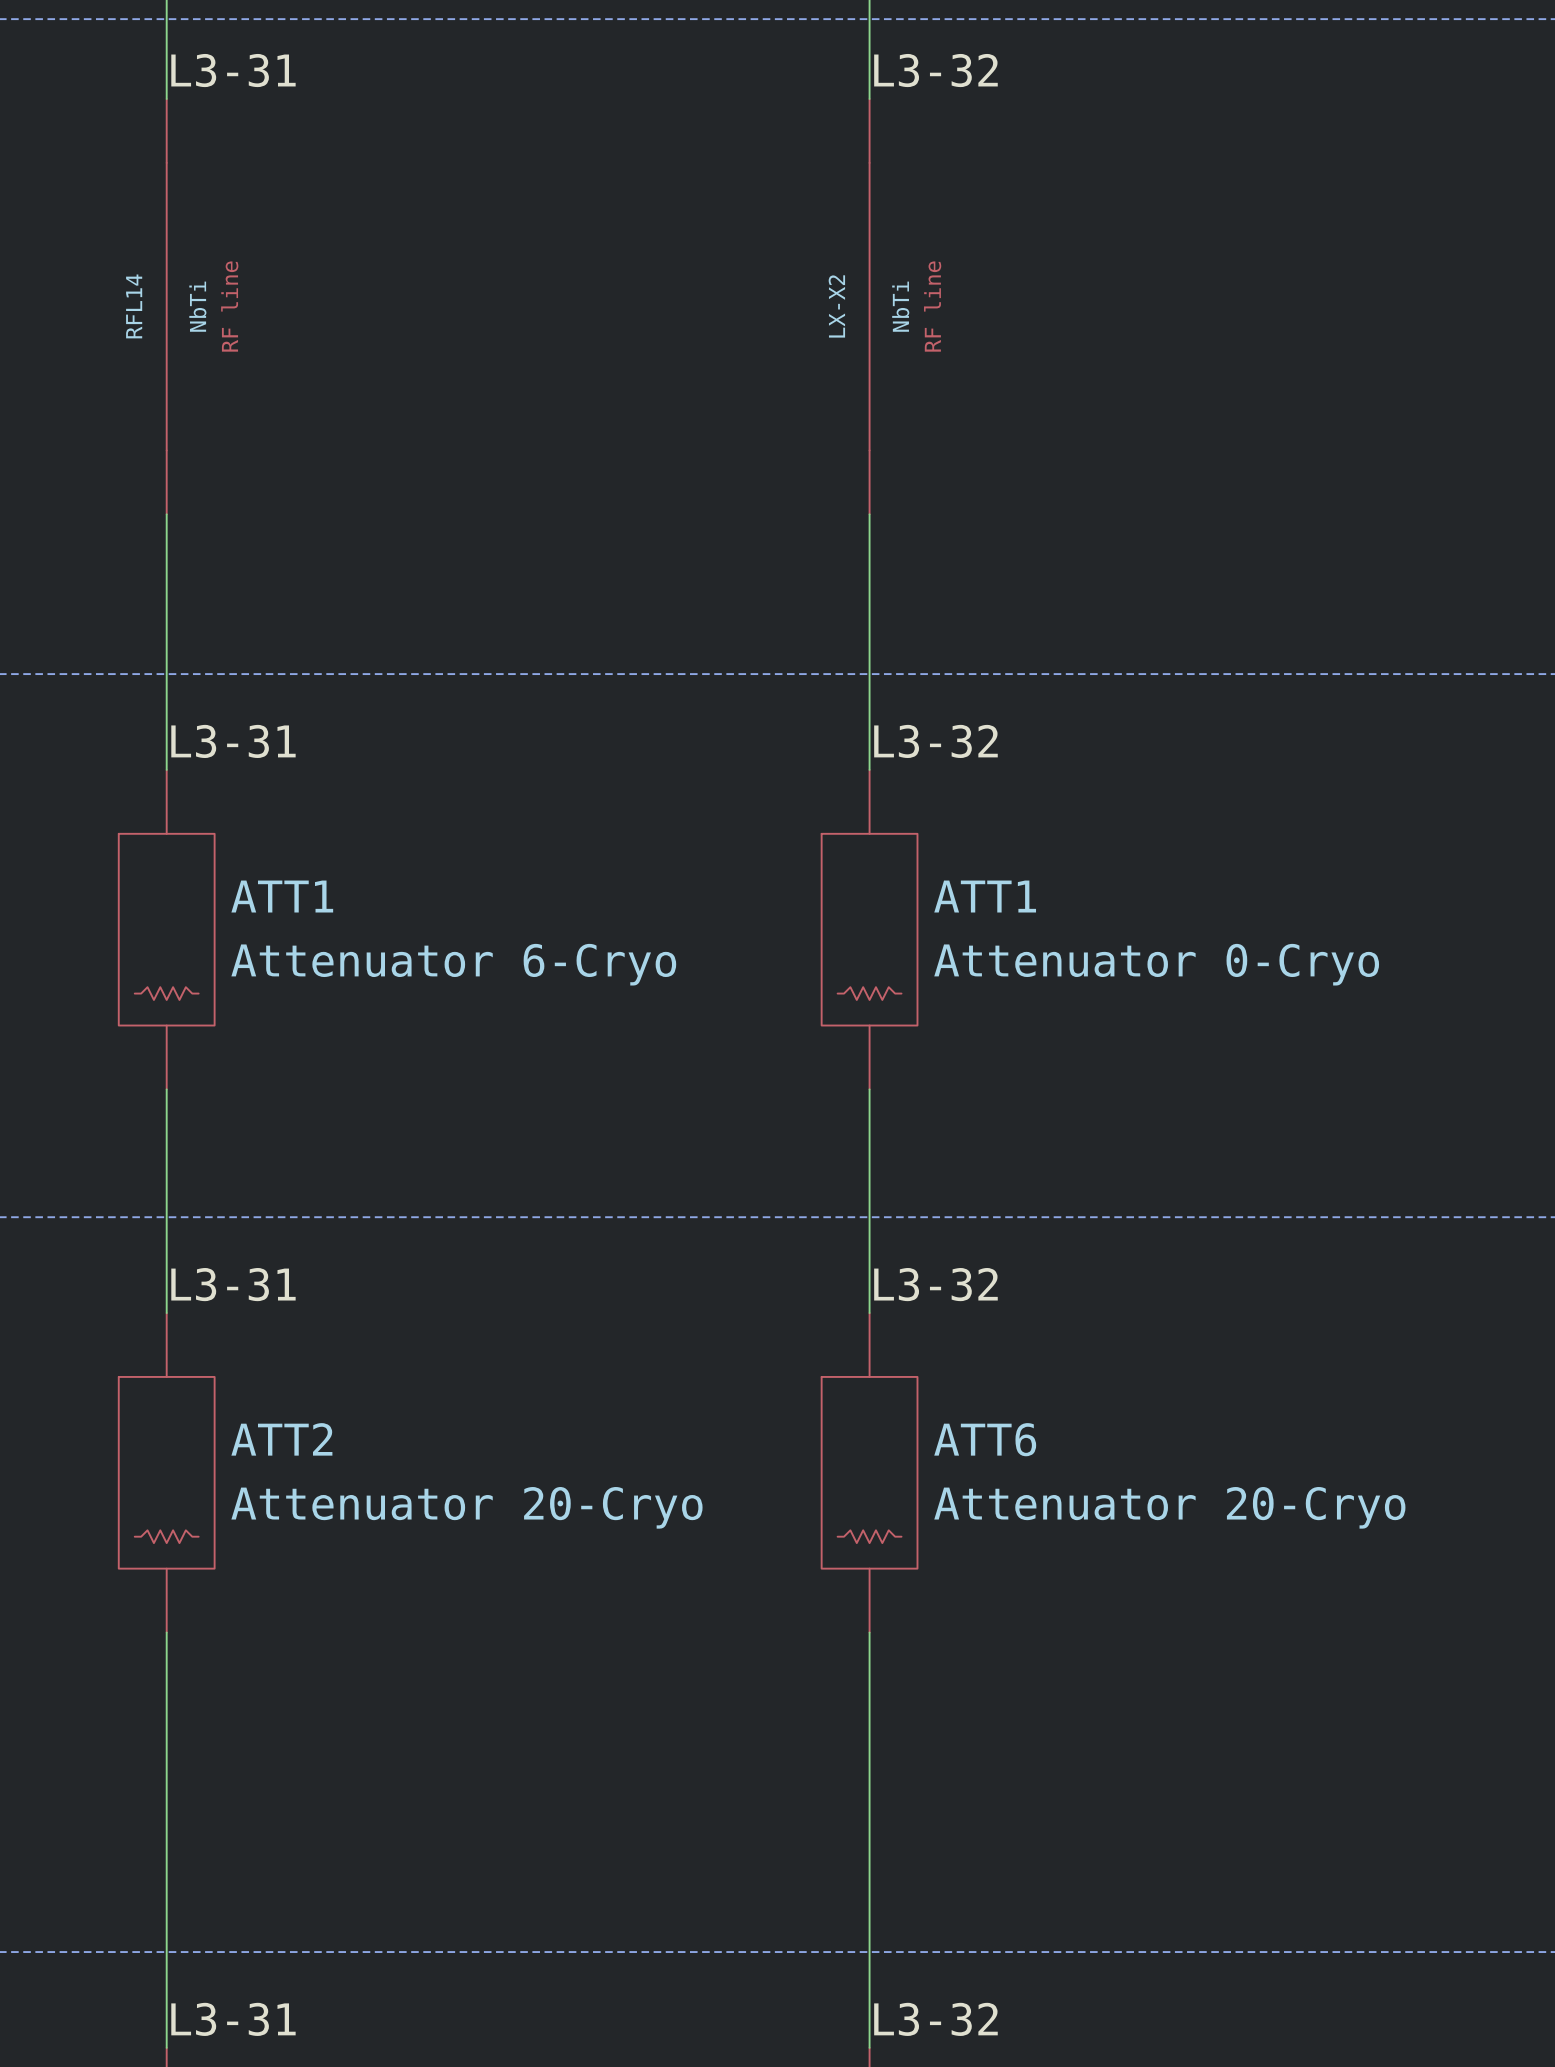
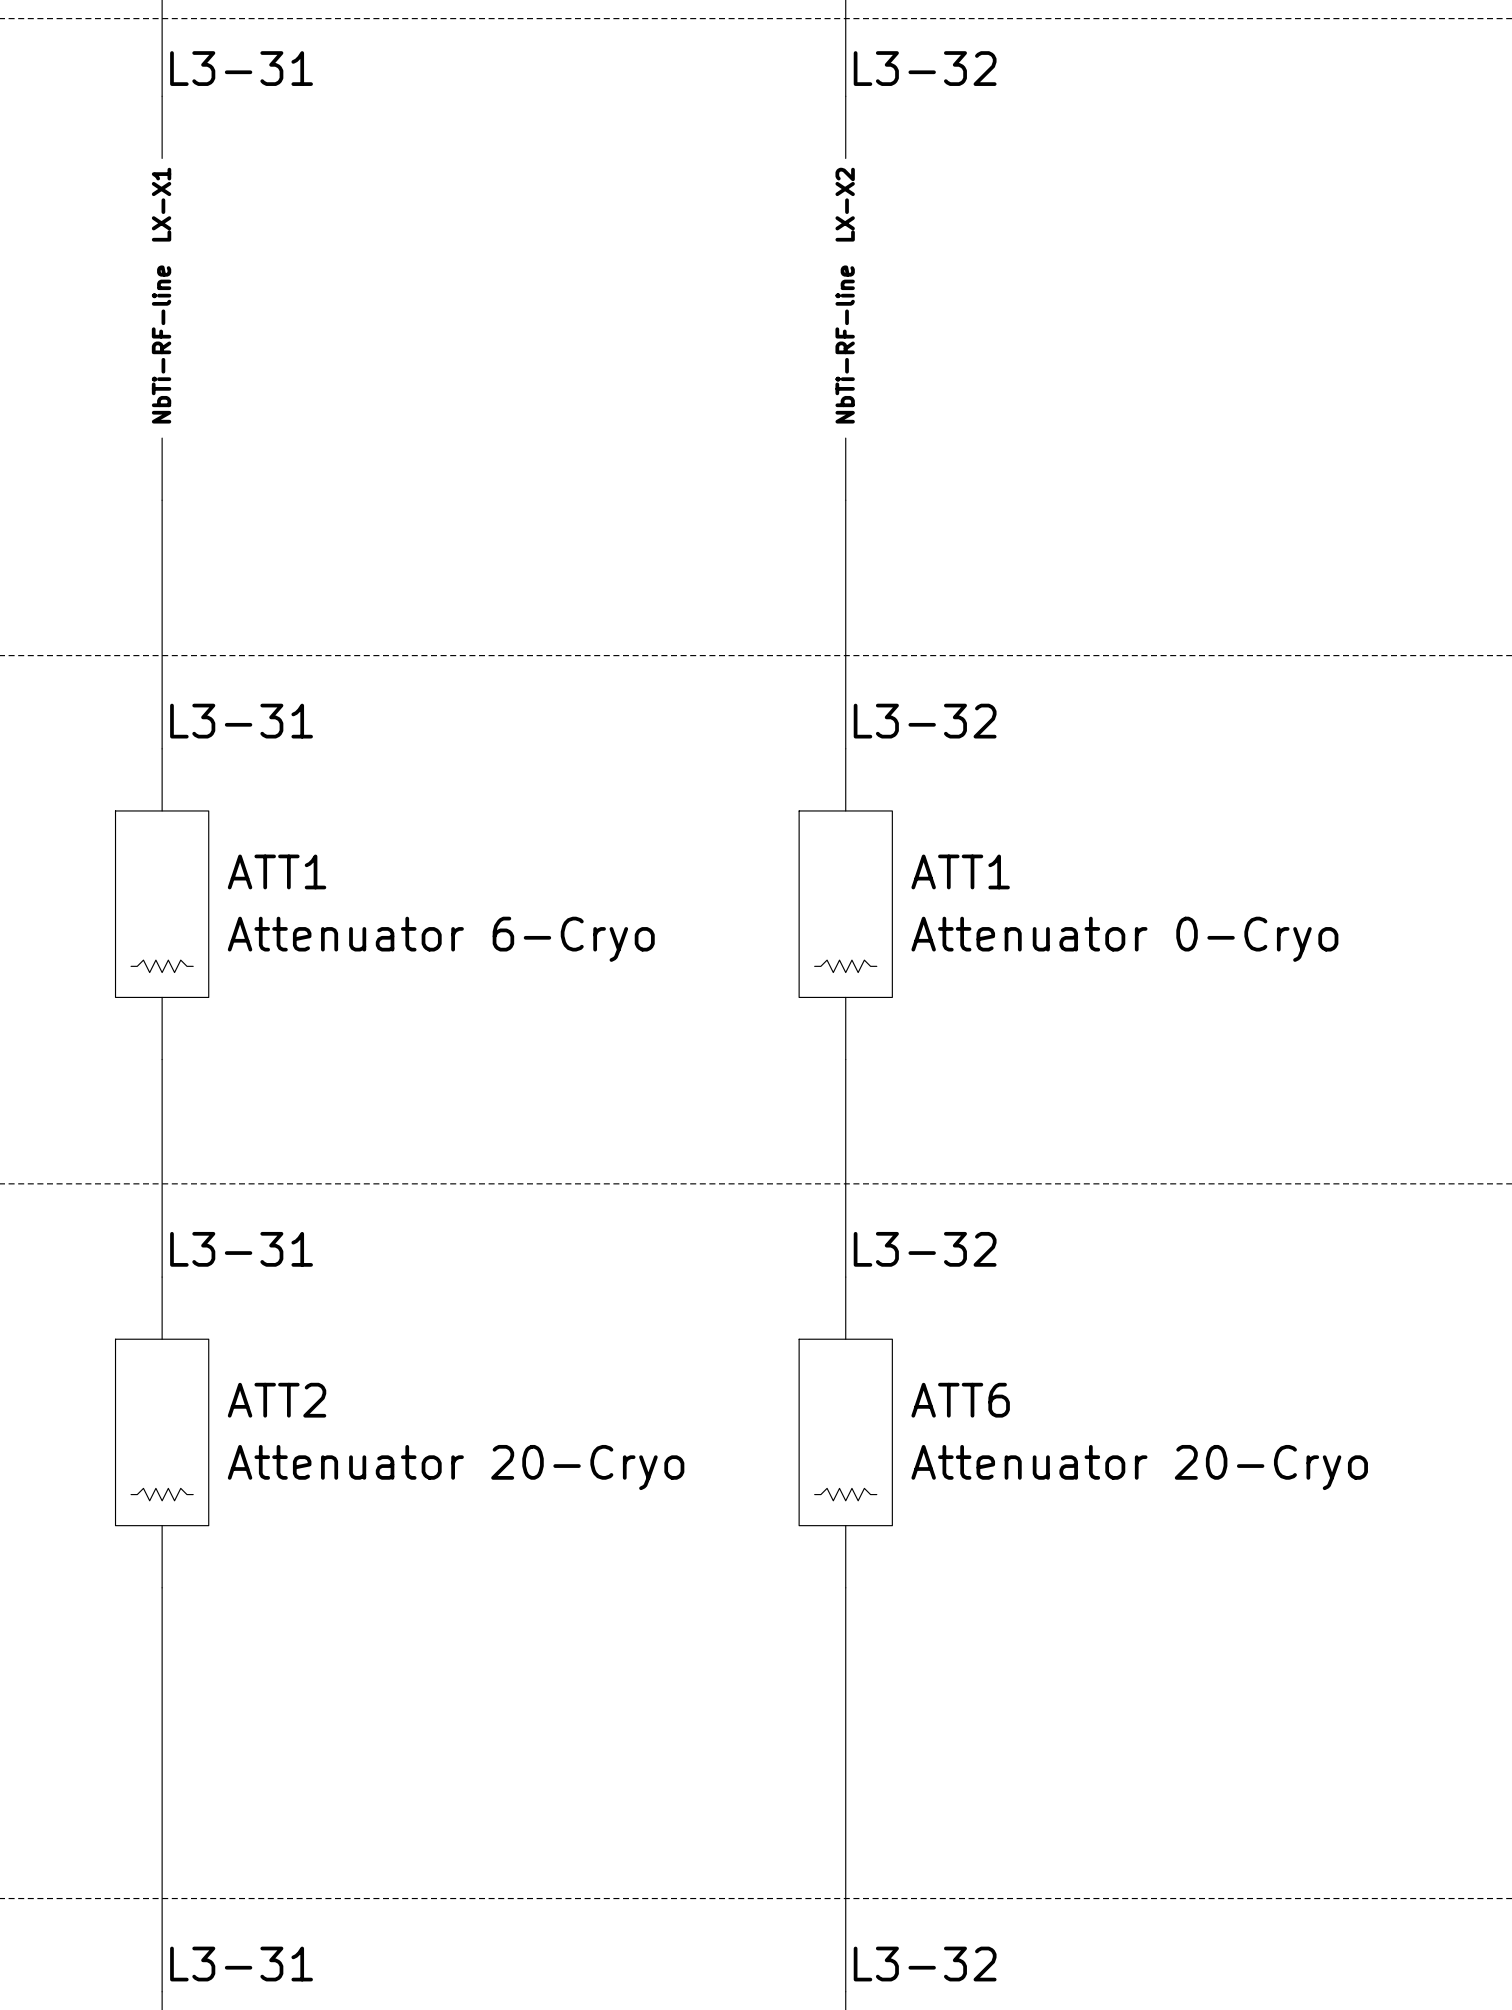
LX-X2 symbol: [869, 99, 870, 515] -> [845, 96, 846, 501]
RFL14: NbTi (166, 306) -> none
LX-X1: none -> NbTi-RF-line (162, 298)
LX-X2 name position: LX-X2 (836, 306) -> LX-X2 (845, 204)
LX-X2 value: NbTi (900, 306) -> NbTi-RF-line (845, 344)

